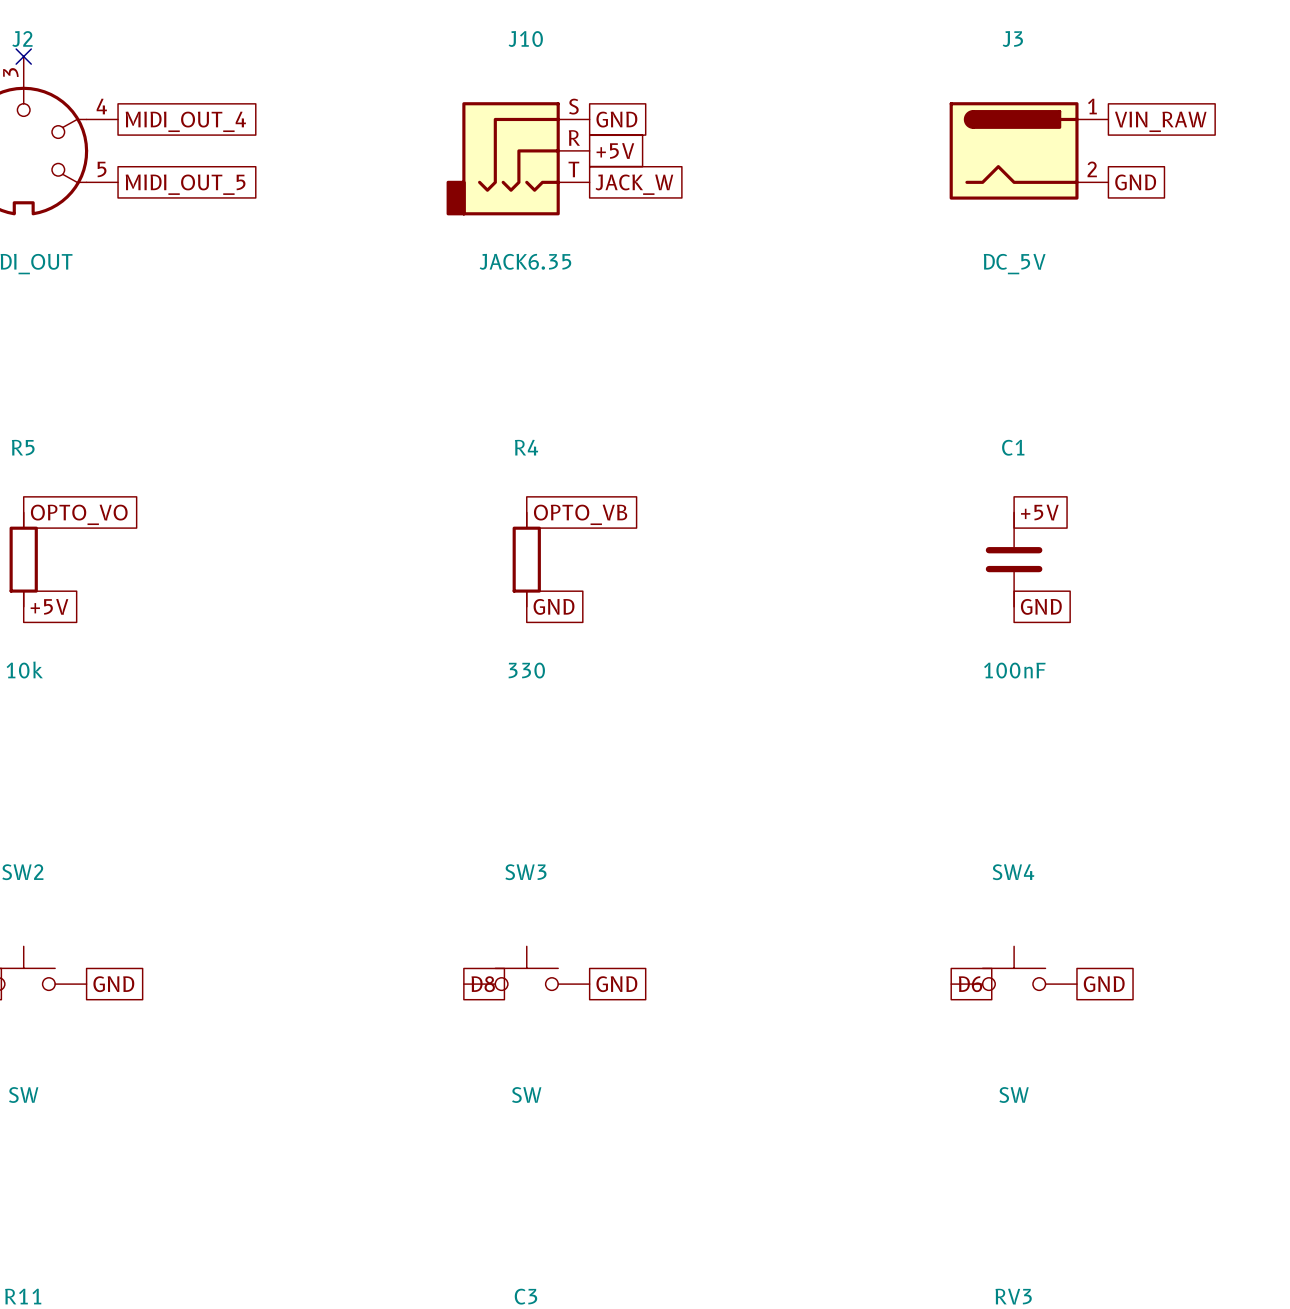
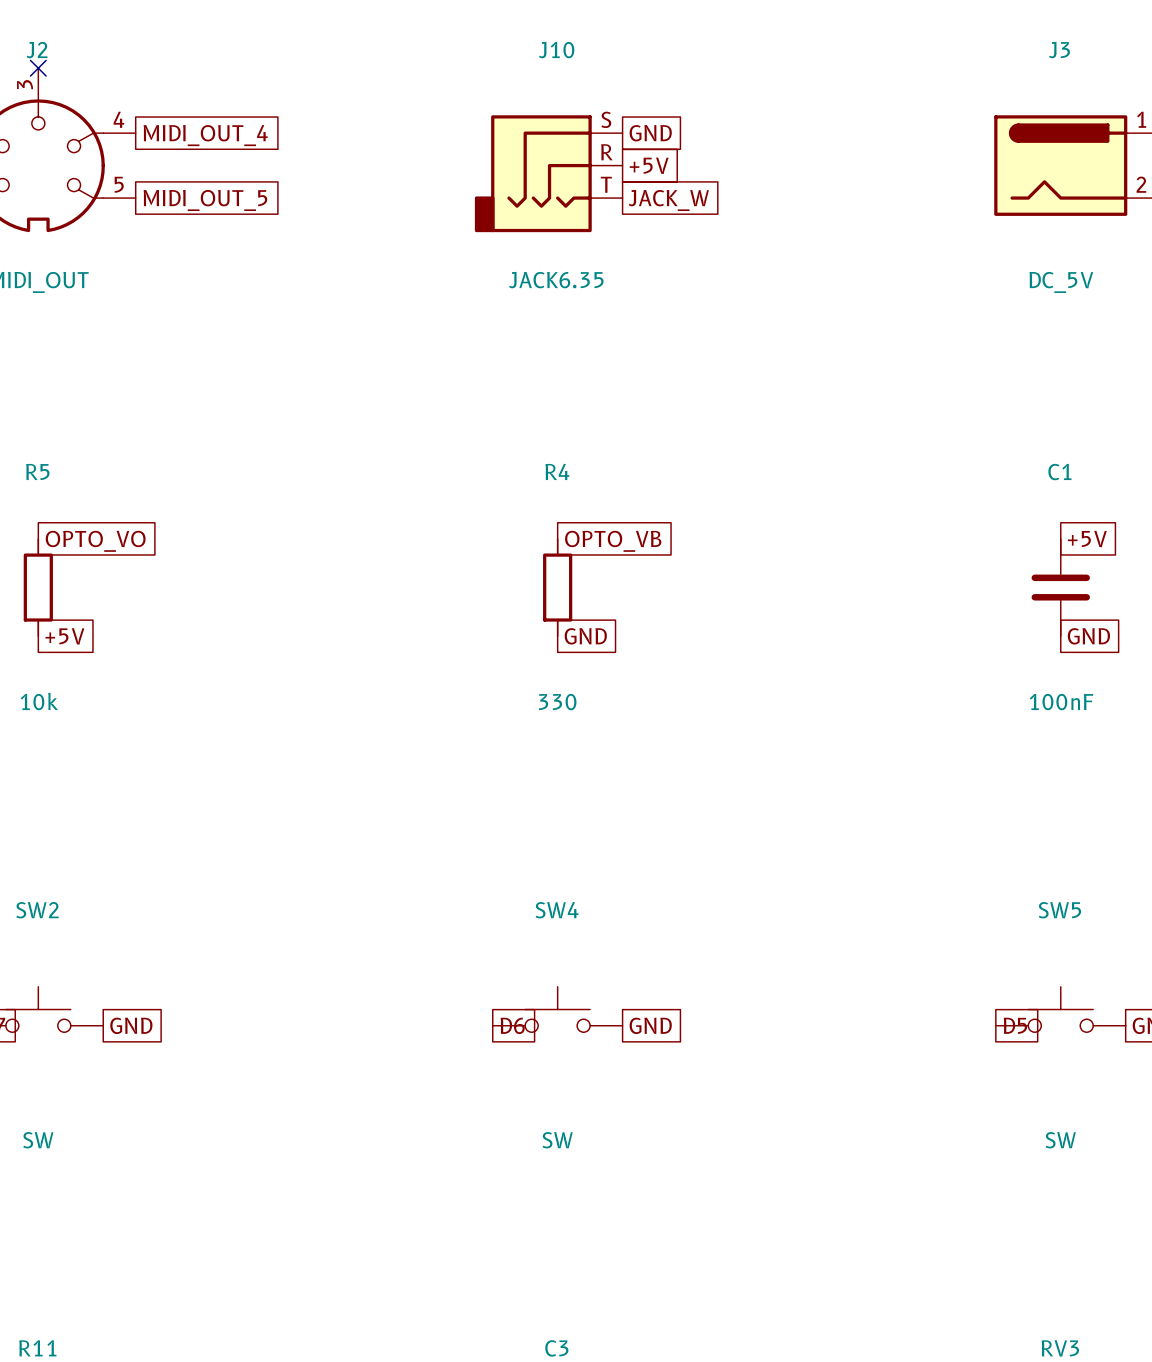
SW3 name: SW3 (525, 872) -> SW4 (557, 910)
SW4 name: SW4 (1013, 872) -> SW5 (1059, 910)
global label: D8 (483, 984) -> D6 (512, 1025)
global label: D6 (970, 984) -> D5 (1015, 1025)

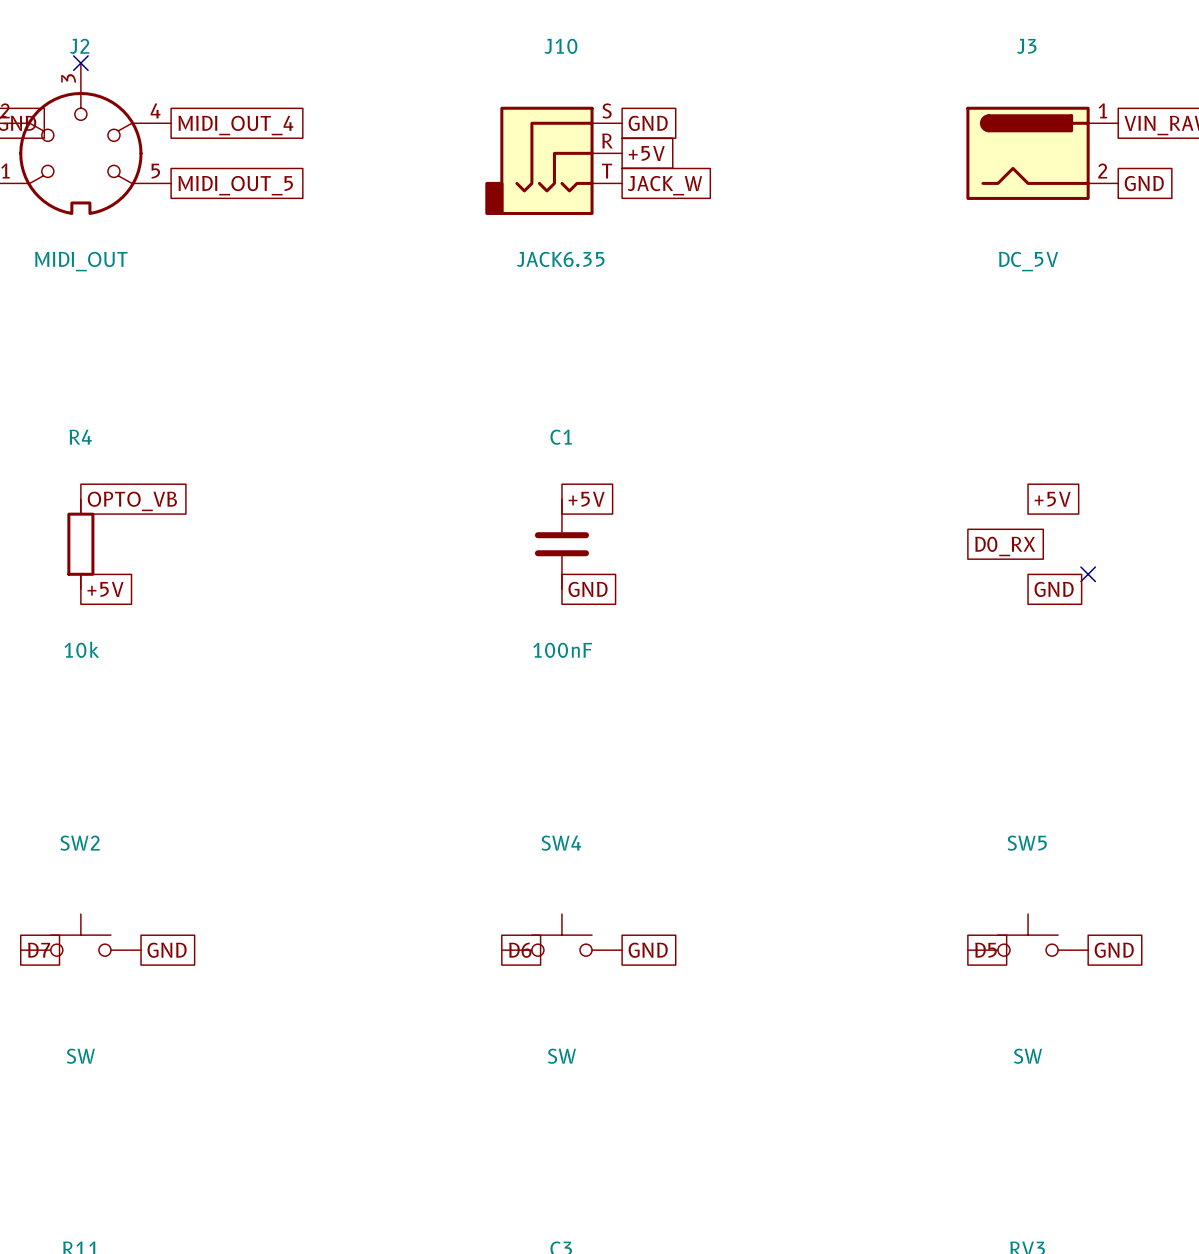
R5 name: R5 (37, 471) -> R4 (80, 437)
global label: OPTO_VO (95, 541) -> OPTO_VB (132, 501)
global label: OPTO_VB (613, 541) -> +5V (586, 499)
R4: 330 (557, 587) -> none
C1 position: (1060, 587) -> (561, 544)
global label: none -> D0_RX (1005, 546)
no-connect mark: none -> (1088, 574)

